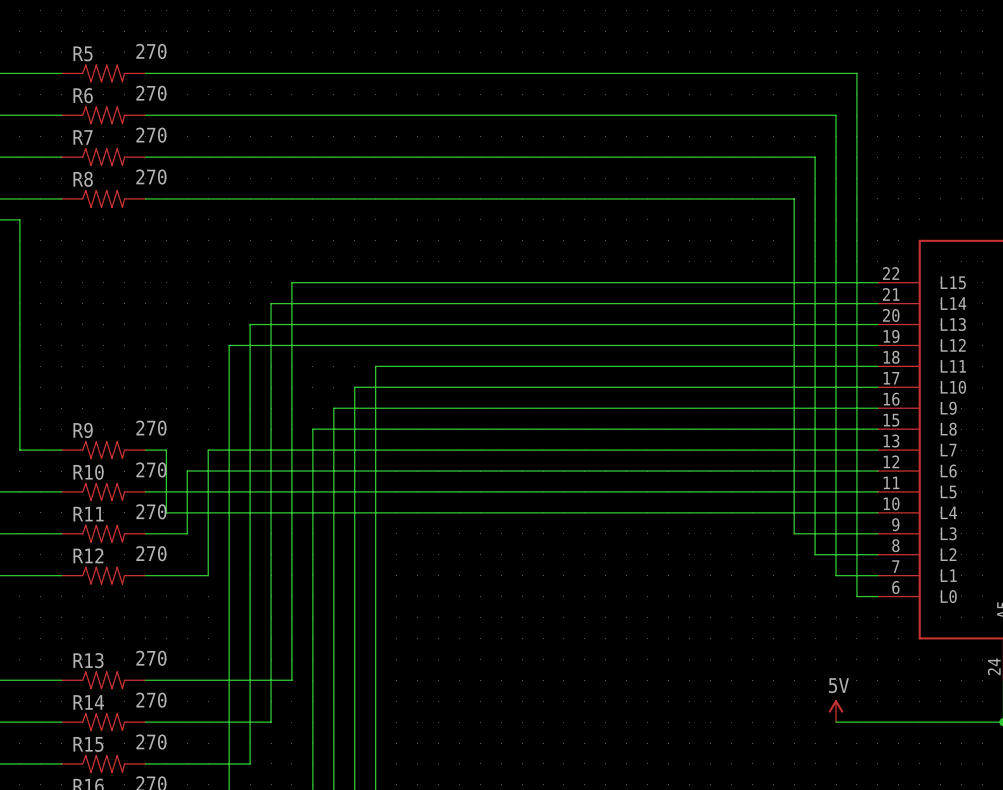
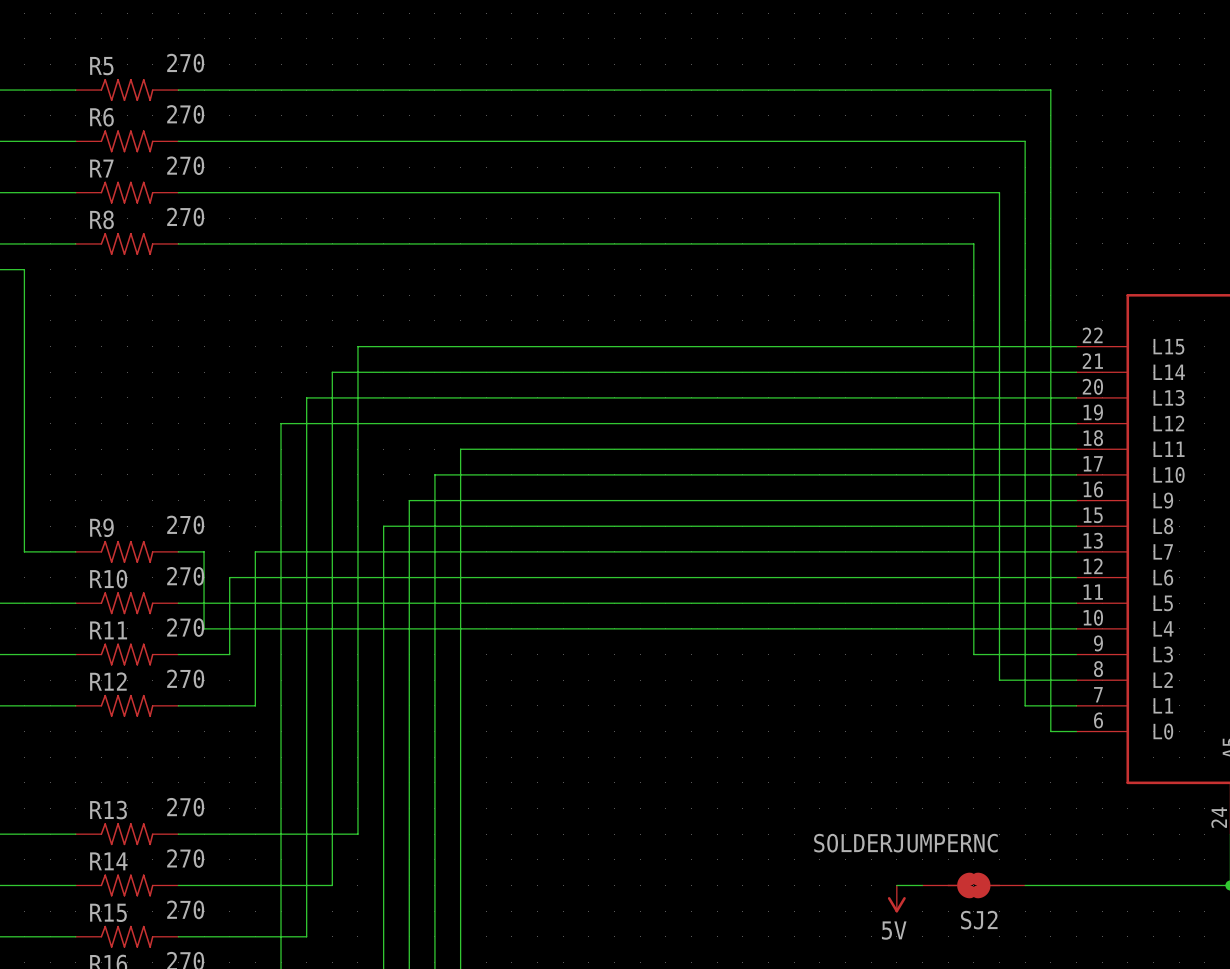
power symbol rotation: 0° (836, 706) -> 180° (896, 904)
power symbol position: 5V (836, 711) -> 5V (896, 898)
wire: none -> (896, 885) (922, 885)
SJ2: none -> SOLDERJUMPERNC (973, 885)

